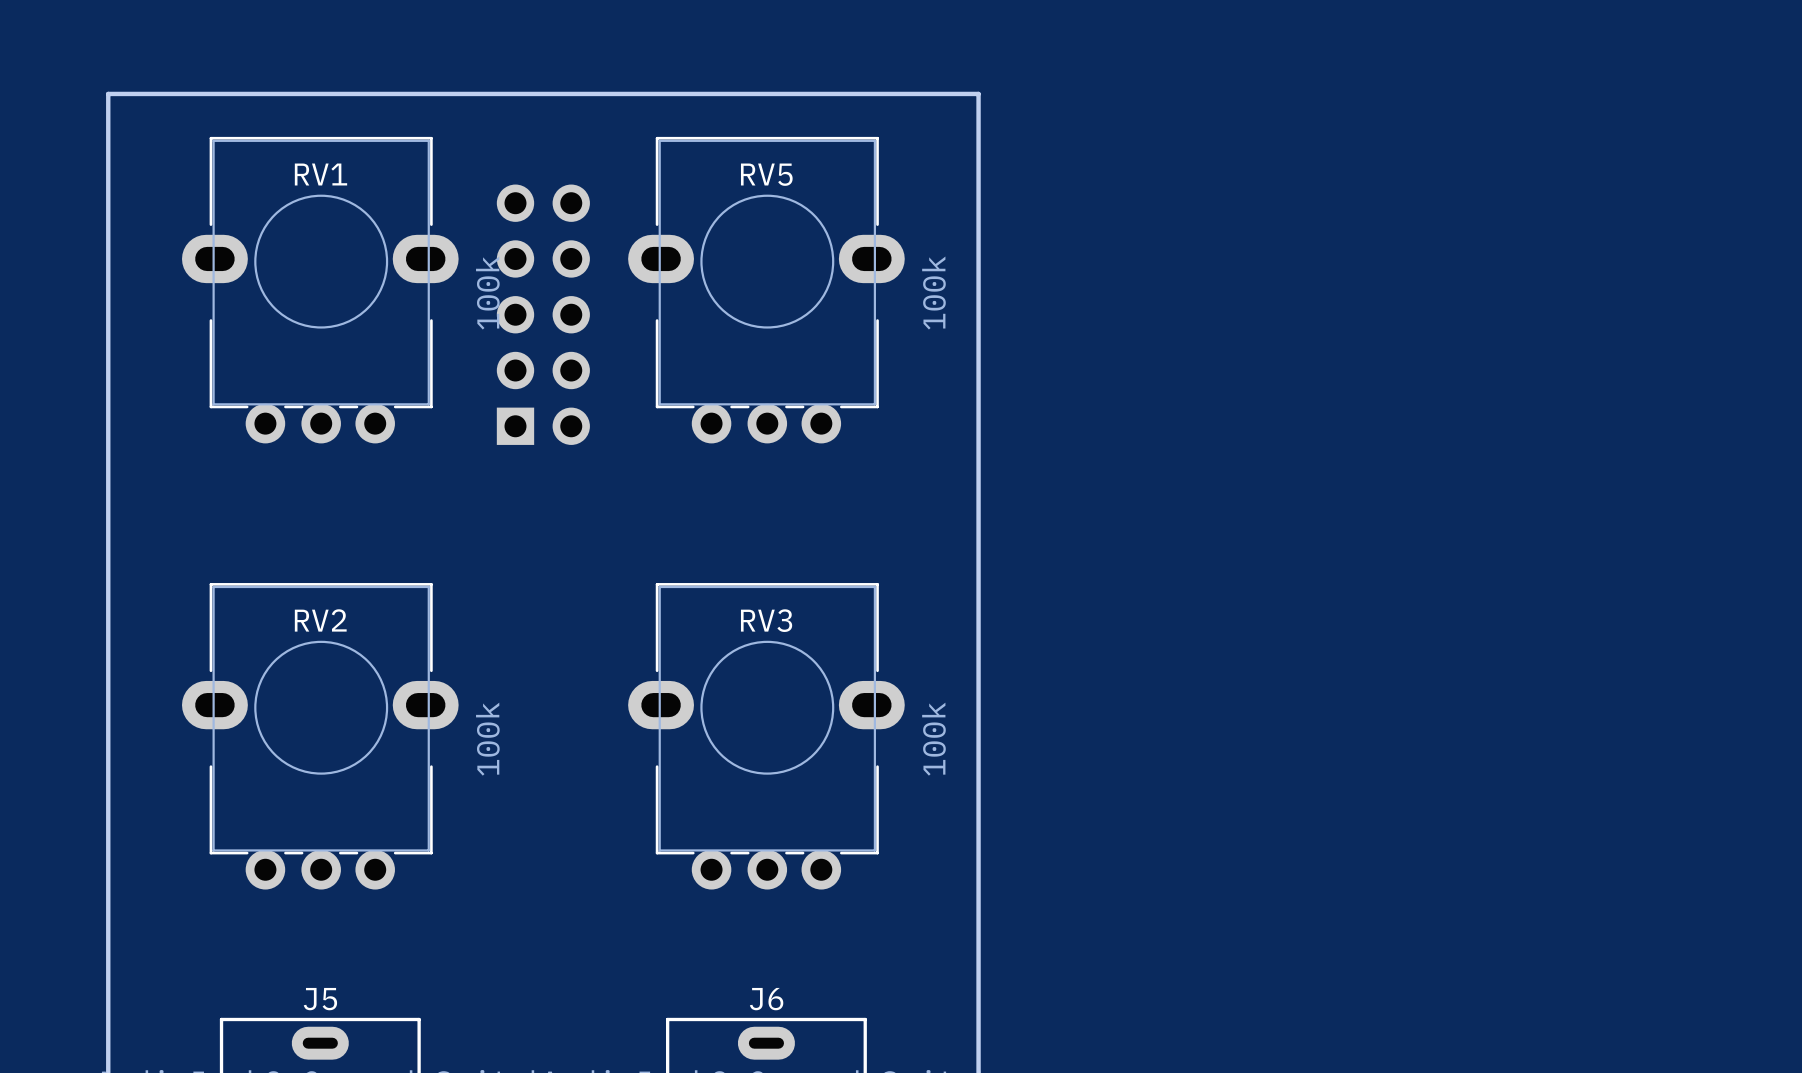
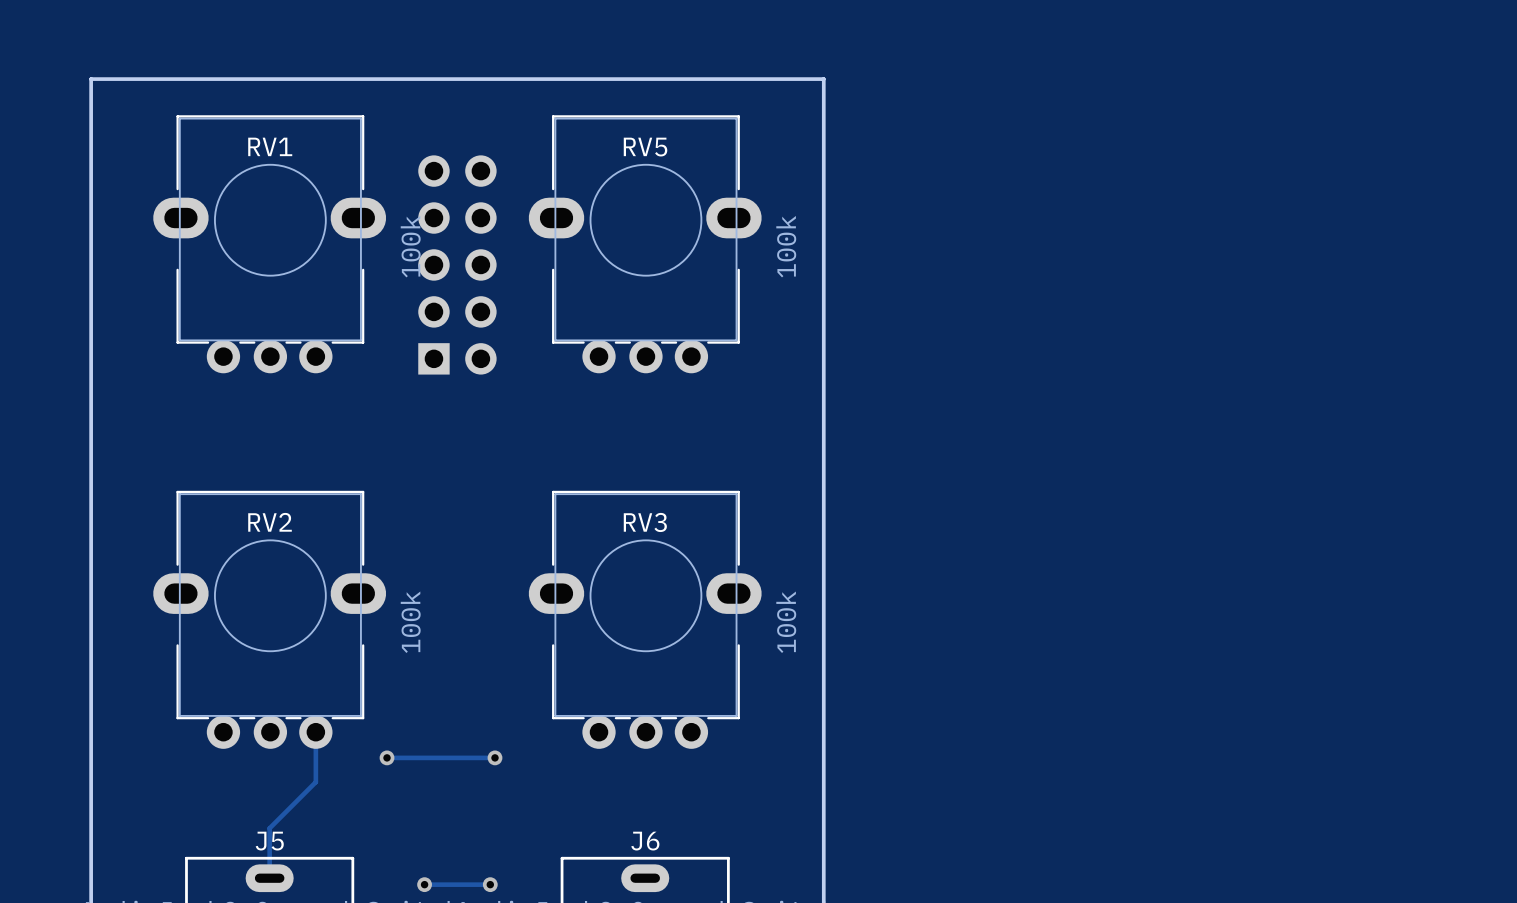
track: none -> (315, 732) (315, 782) (269, 828) (269, 878)
track: none -> (387, 757) (494, 757)
via: none -> (387, 757)
via: none -> (494, 757)
track: none -> (424, 884) (490, 884)
via: none -> (424, 884)
via: none -> (490, 884)

